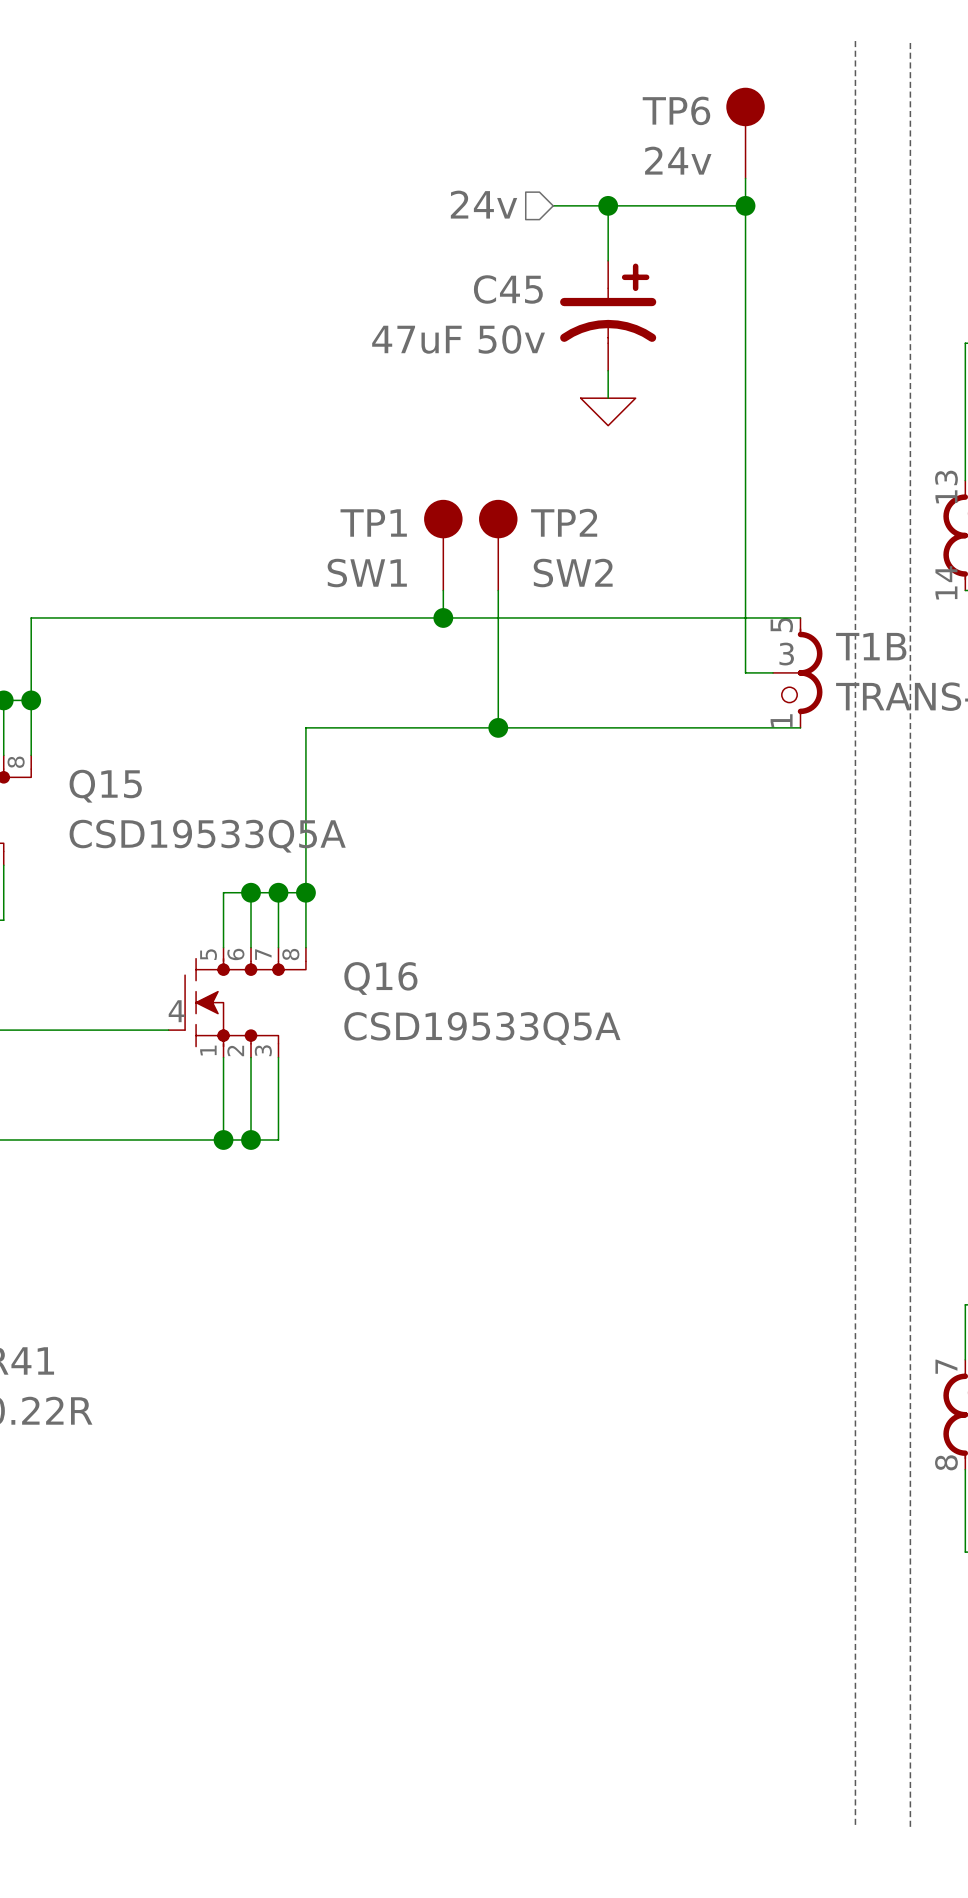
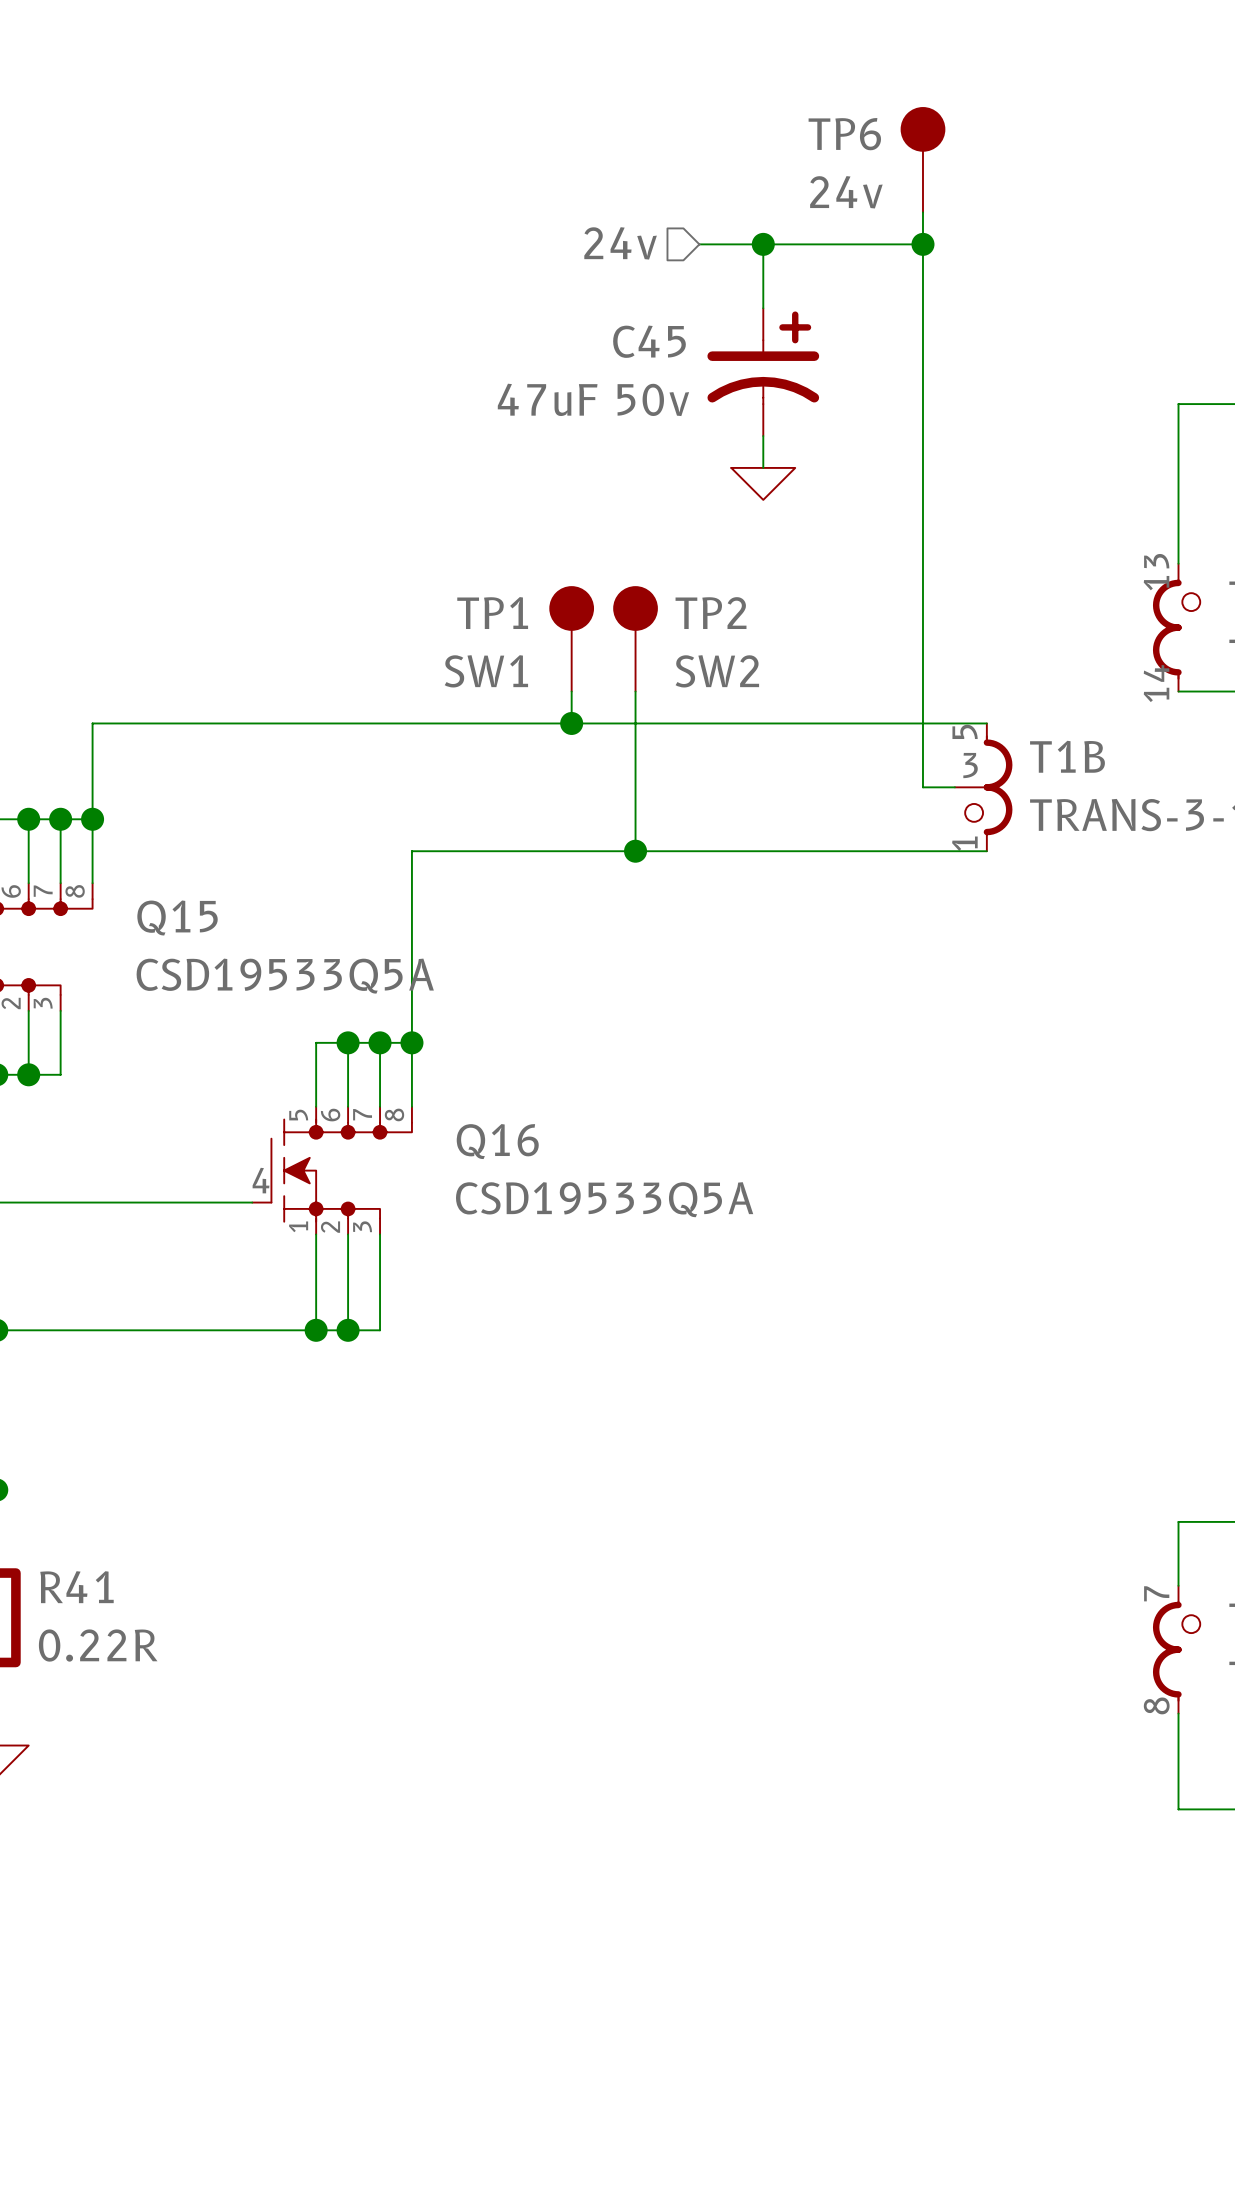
line: (855, 41) (855, 1826) -> none
line: (910, 41) (910, 1826) -> none

